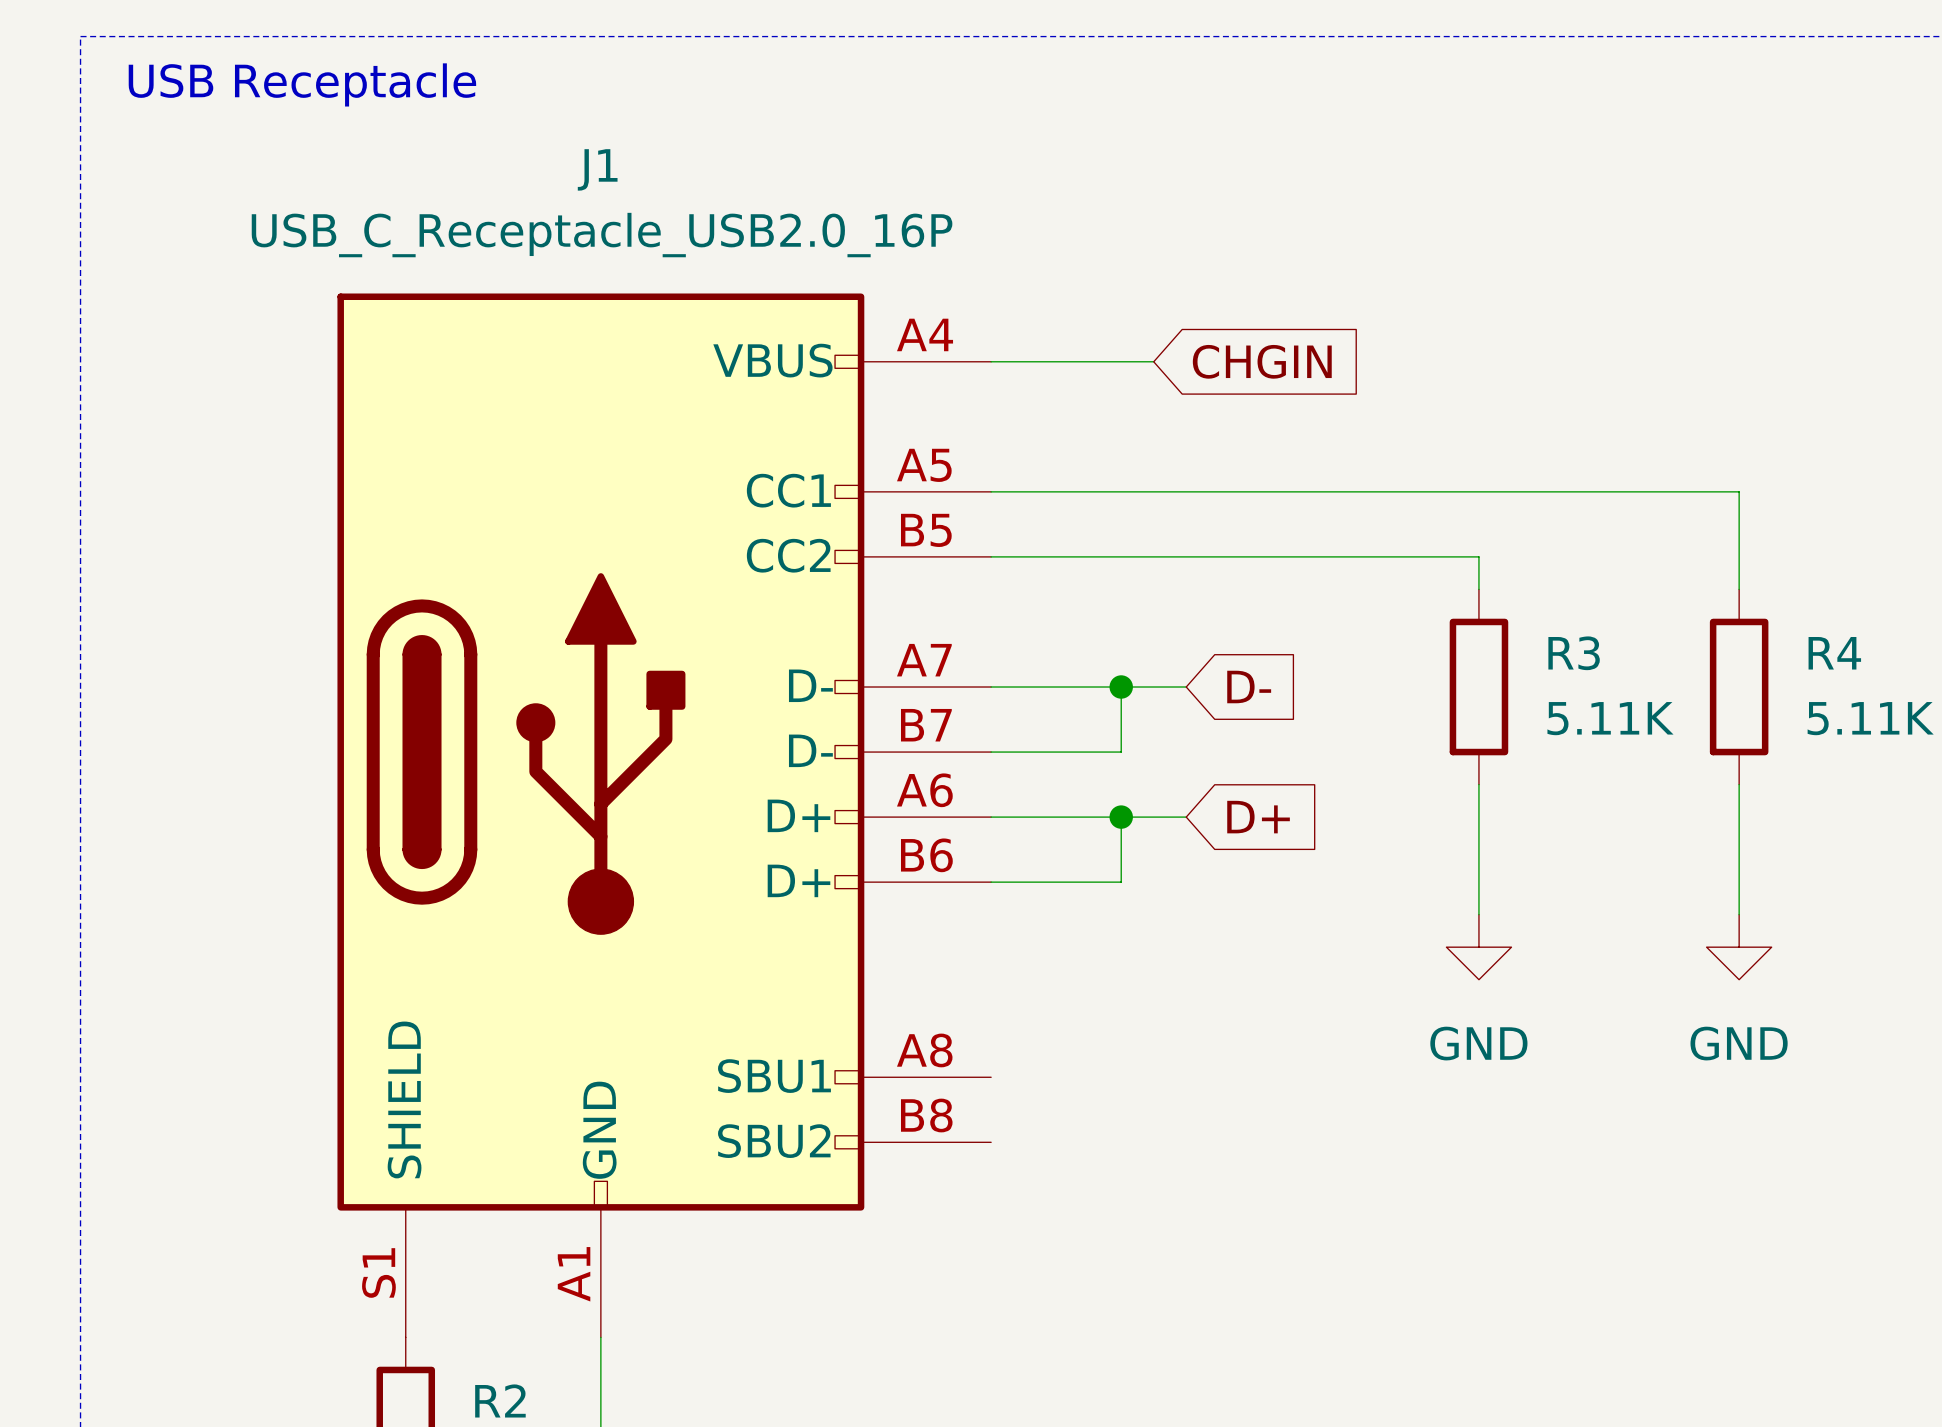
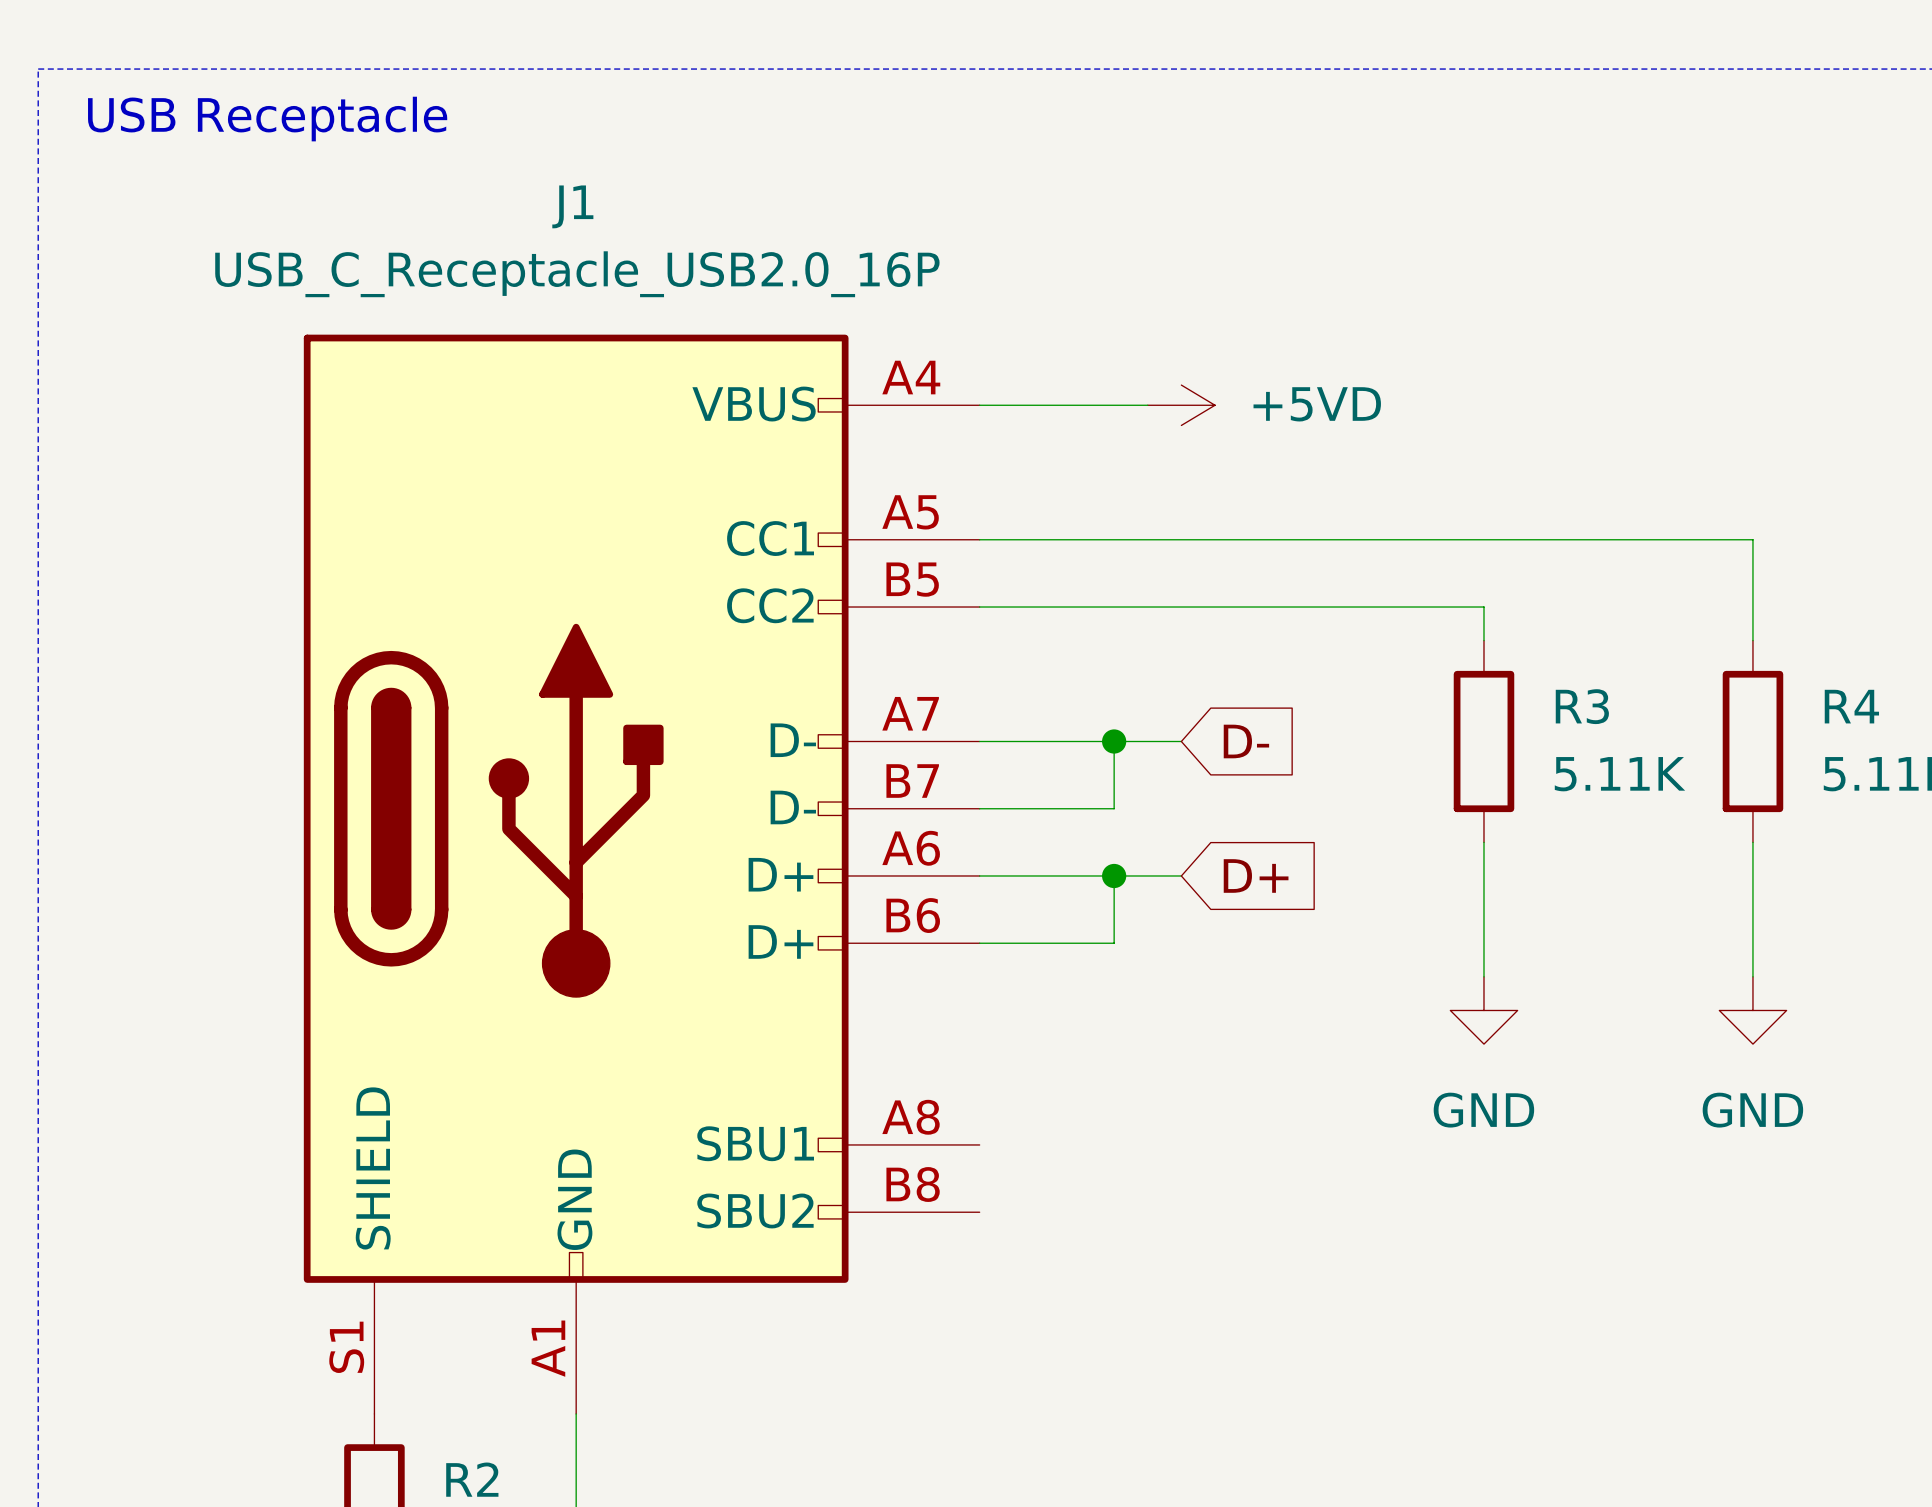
power symbol: none -> +5VD (1181, 405)
global label: CHGIN (1262, 361) -> none

